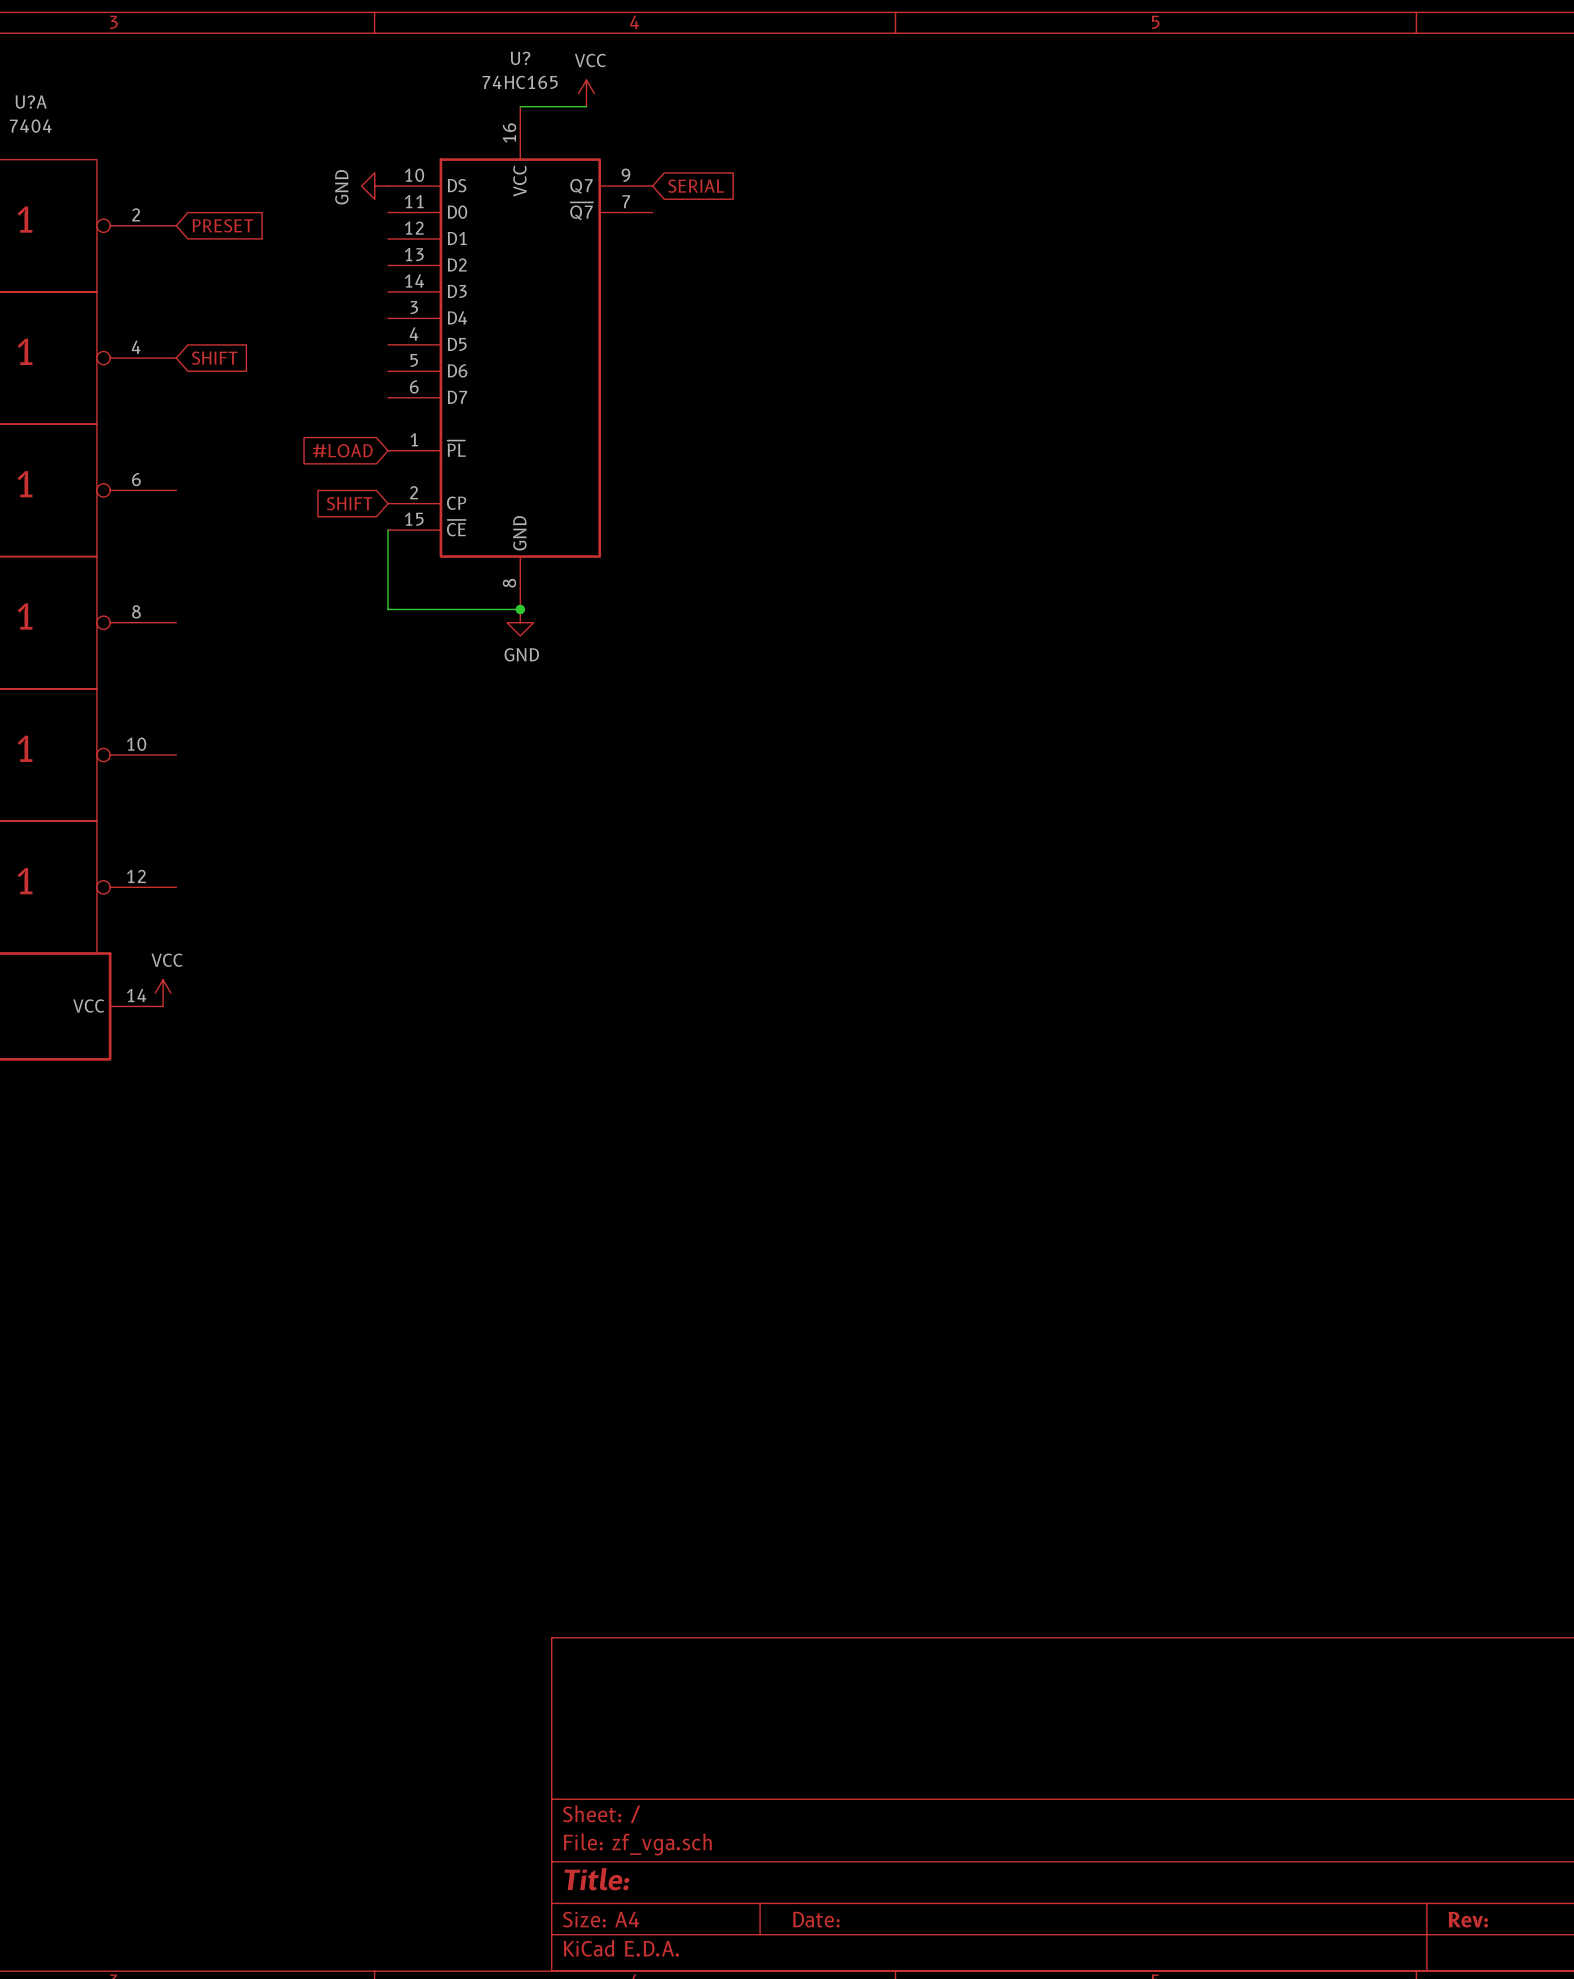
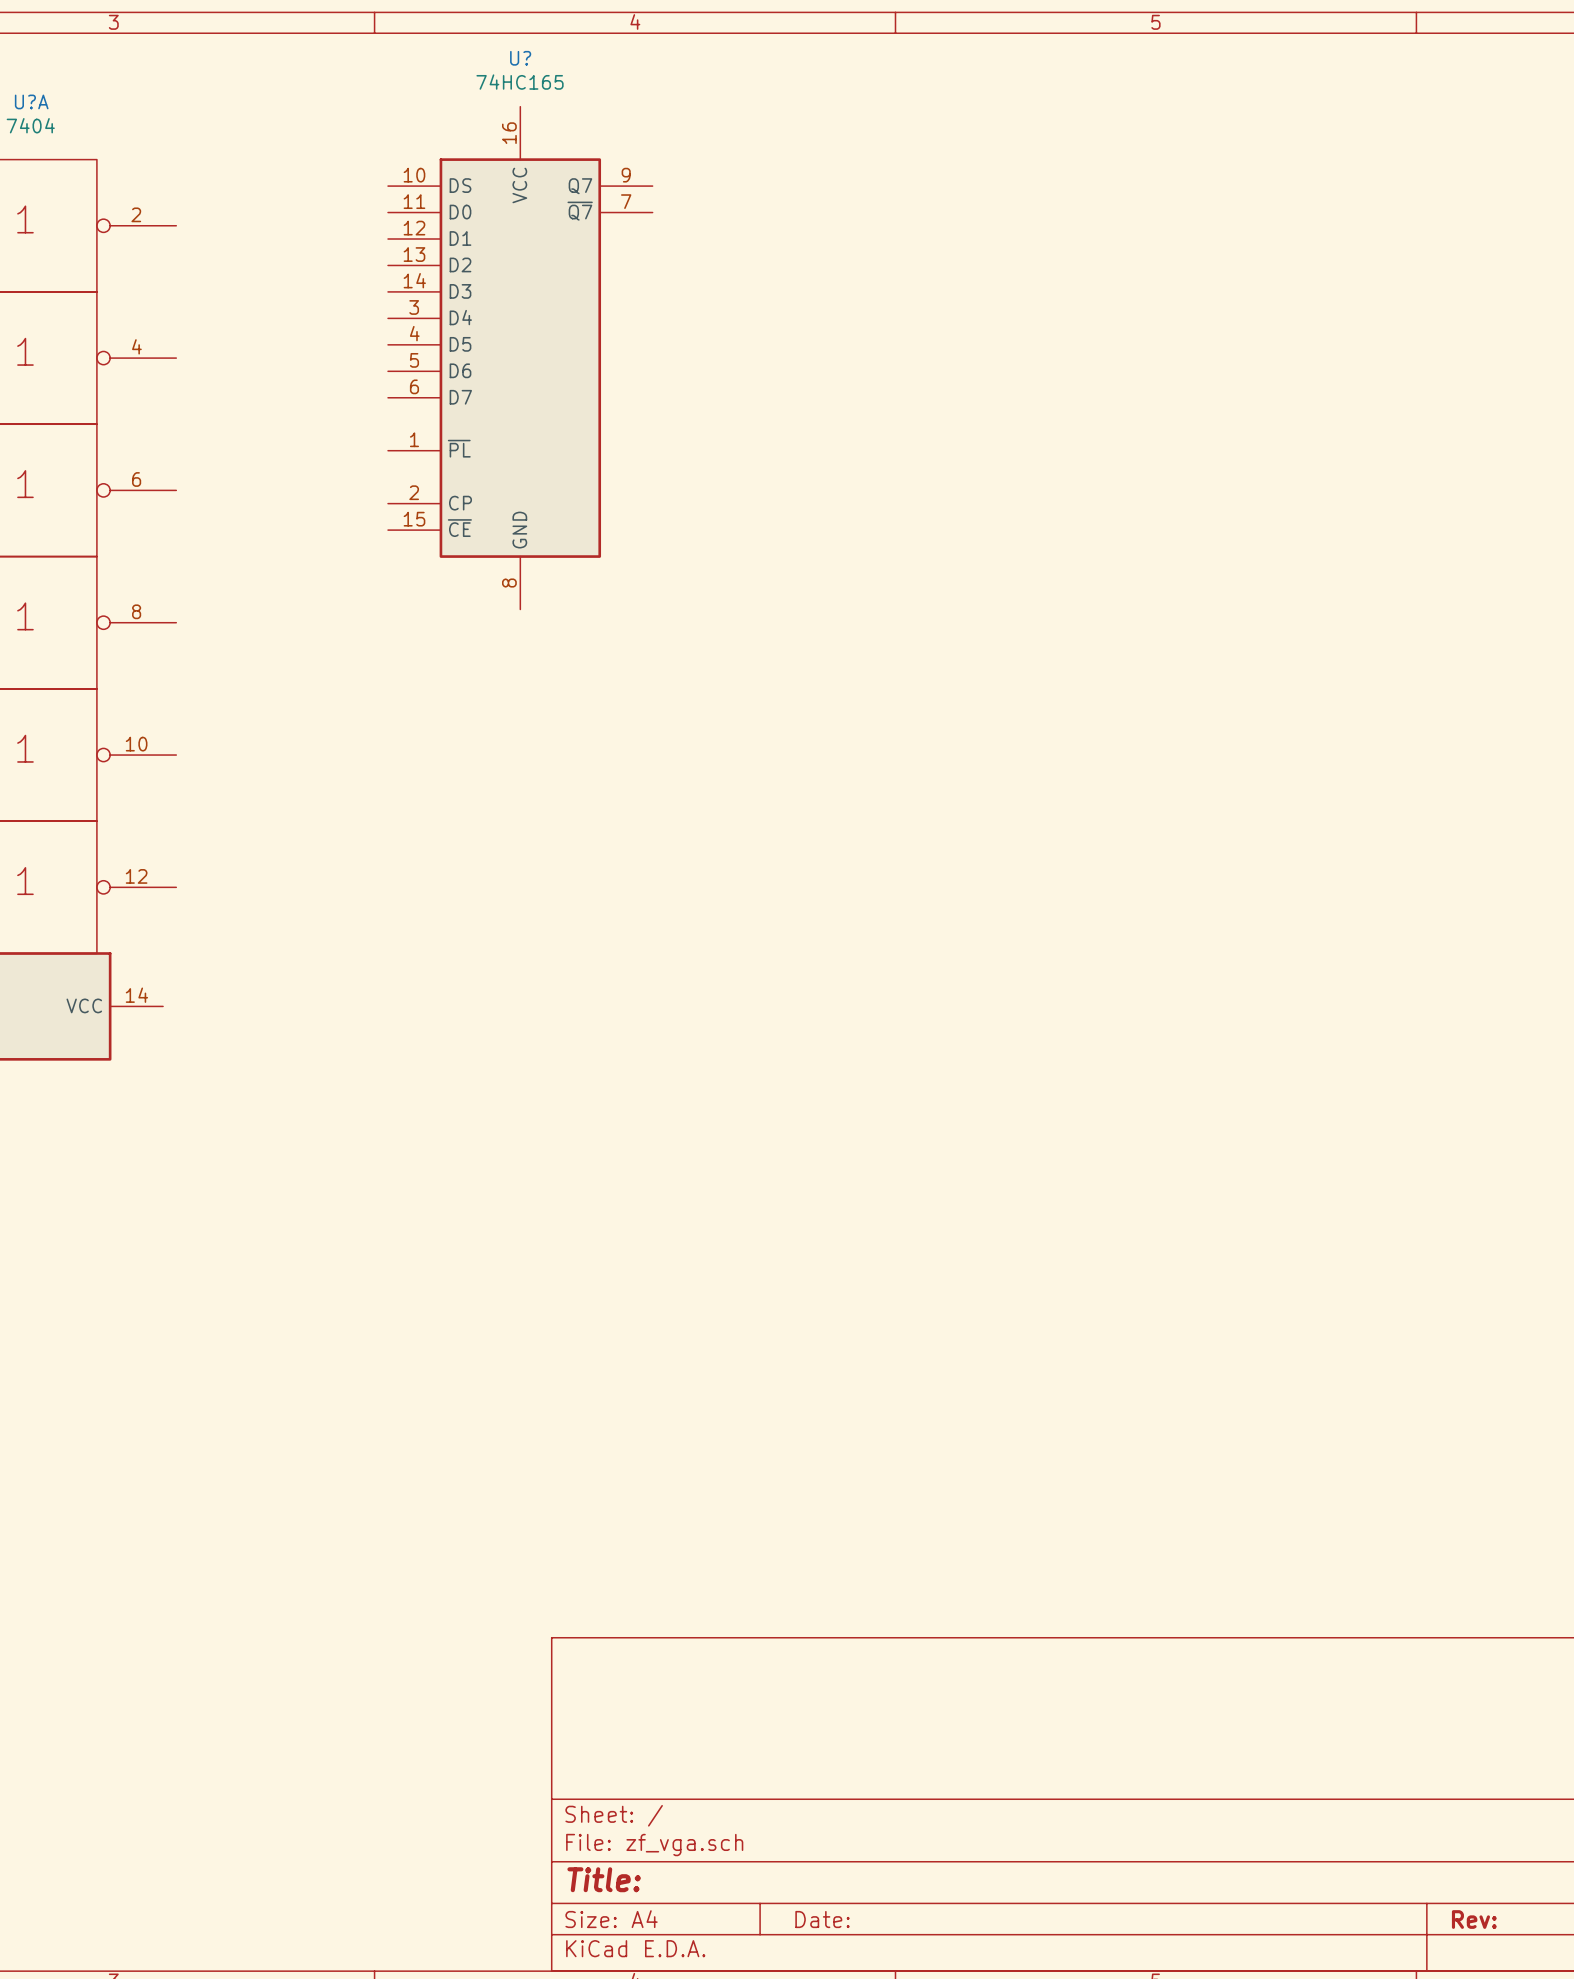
power symbol: VCC (586, 93) -> none
wire: (520, 106) (586, 106) -> none
power symbol: GND (374, 186) -> none
global label: SERIAL (696, 186) -> none
global label: PRESET (222, 225) -> none
global label: SHIFT (214, 358) -> none
global label: #LOAD (342, 450) -> none
global label: SHIFT (349, 503) -> none
wire: (388, 530) (388, 609) (520, 609) -> none
junction: (520, 609) -> none
power symbol: GND (520, 622) -> none
power symbol: VCC (163, 993) -> none

